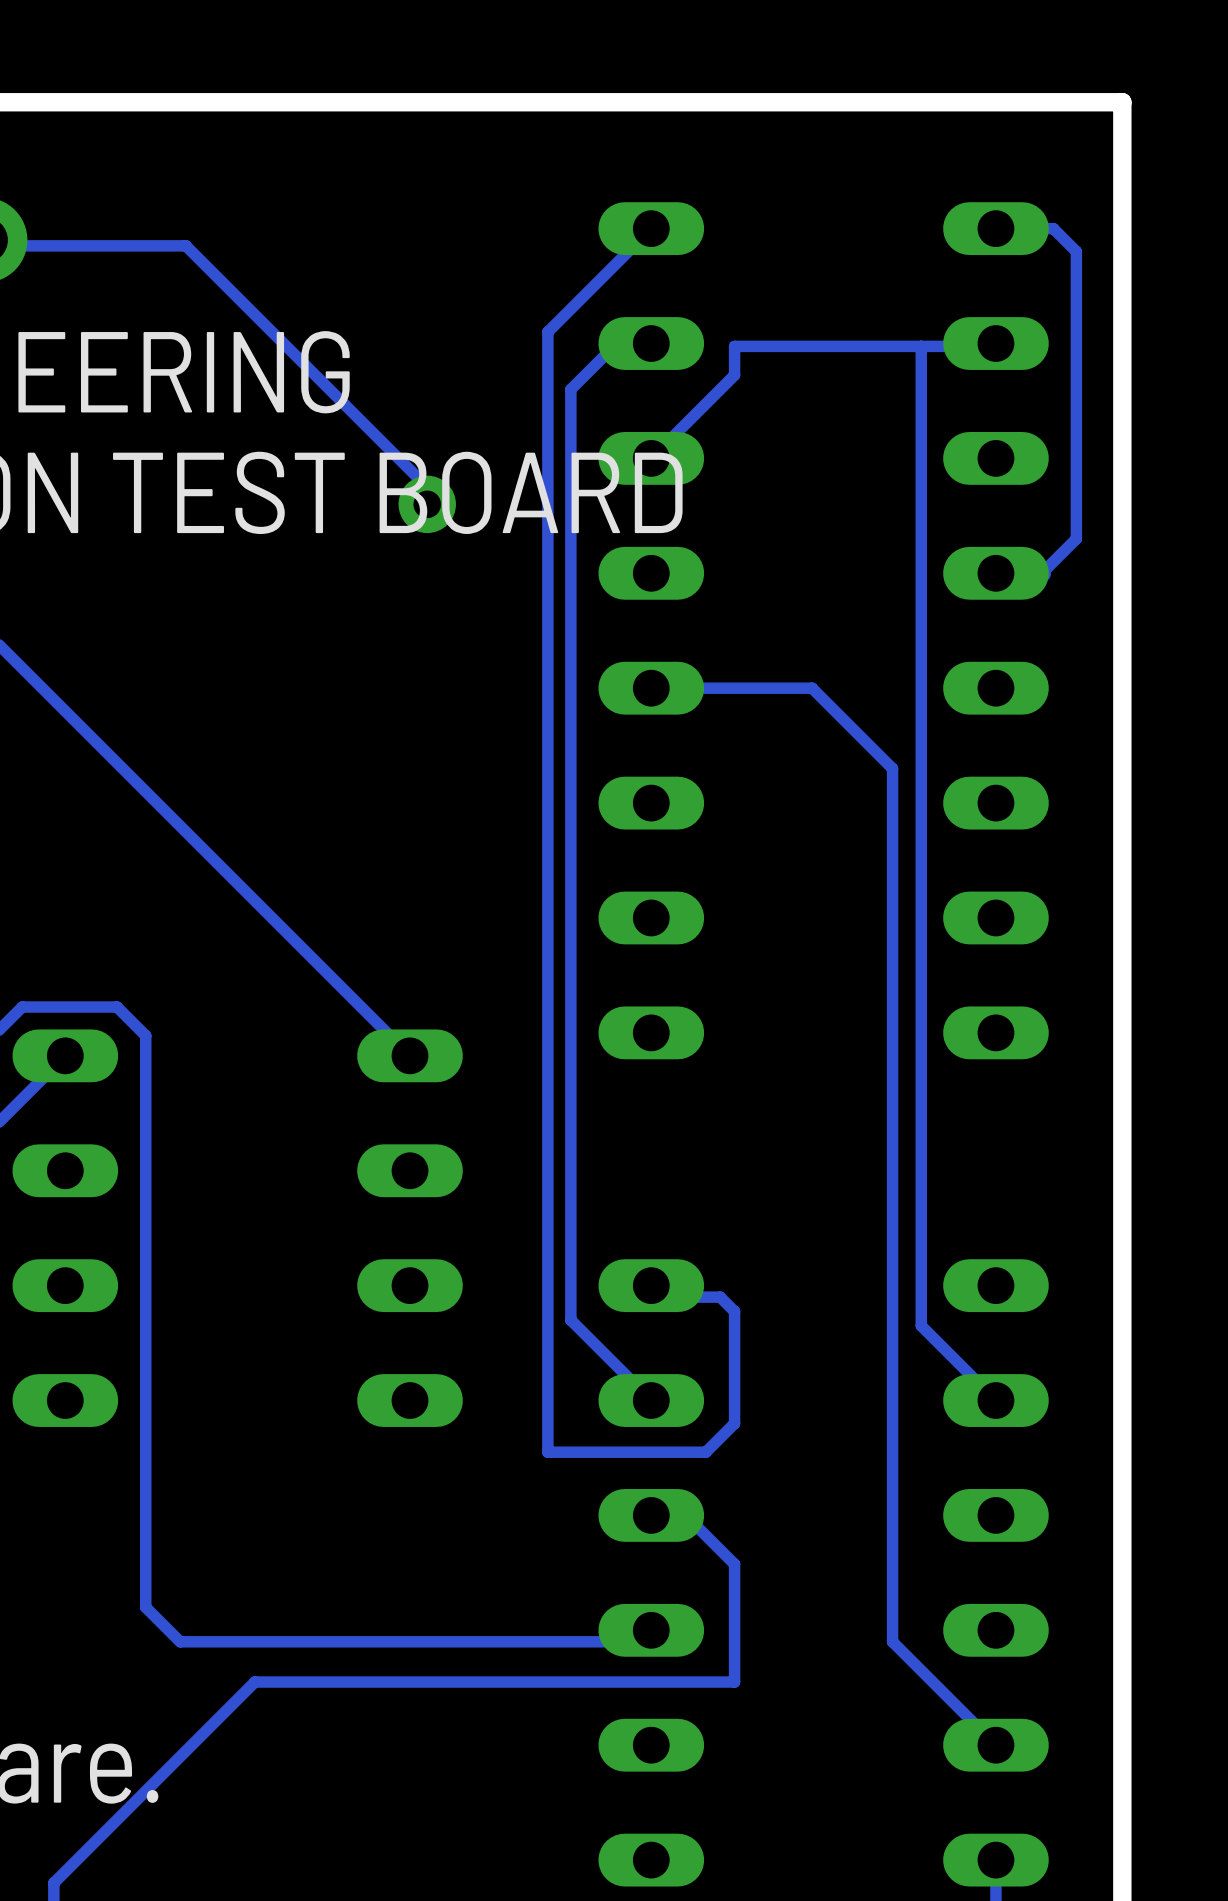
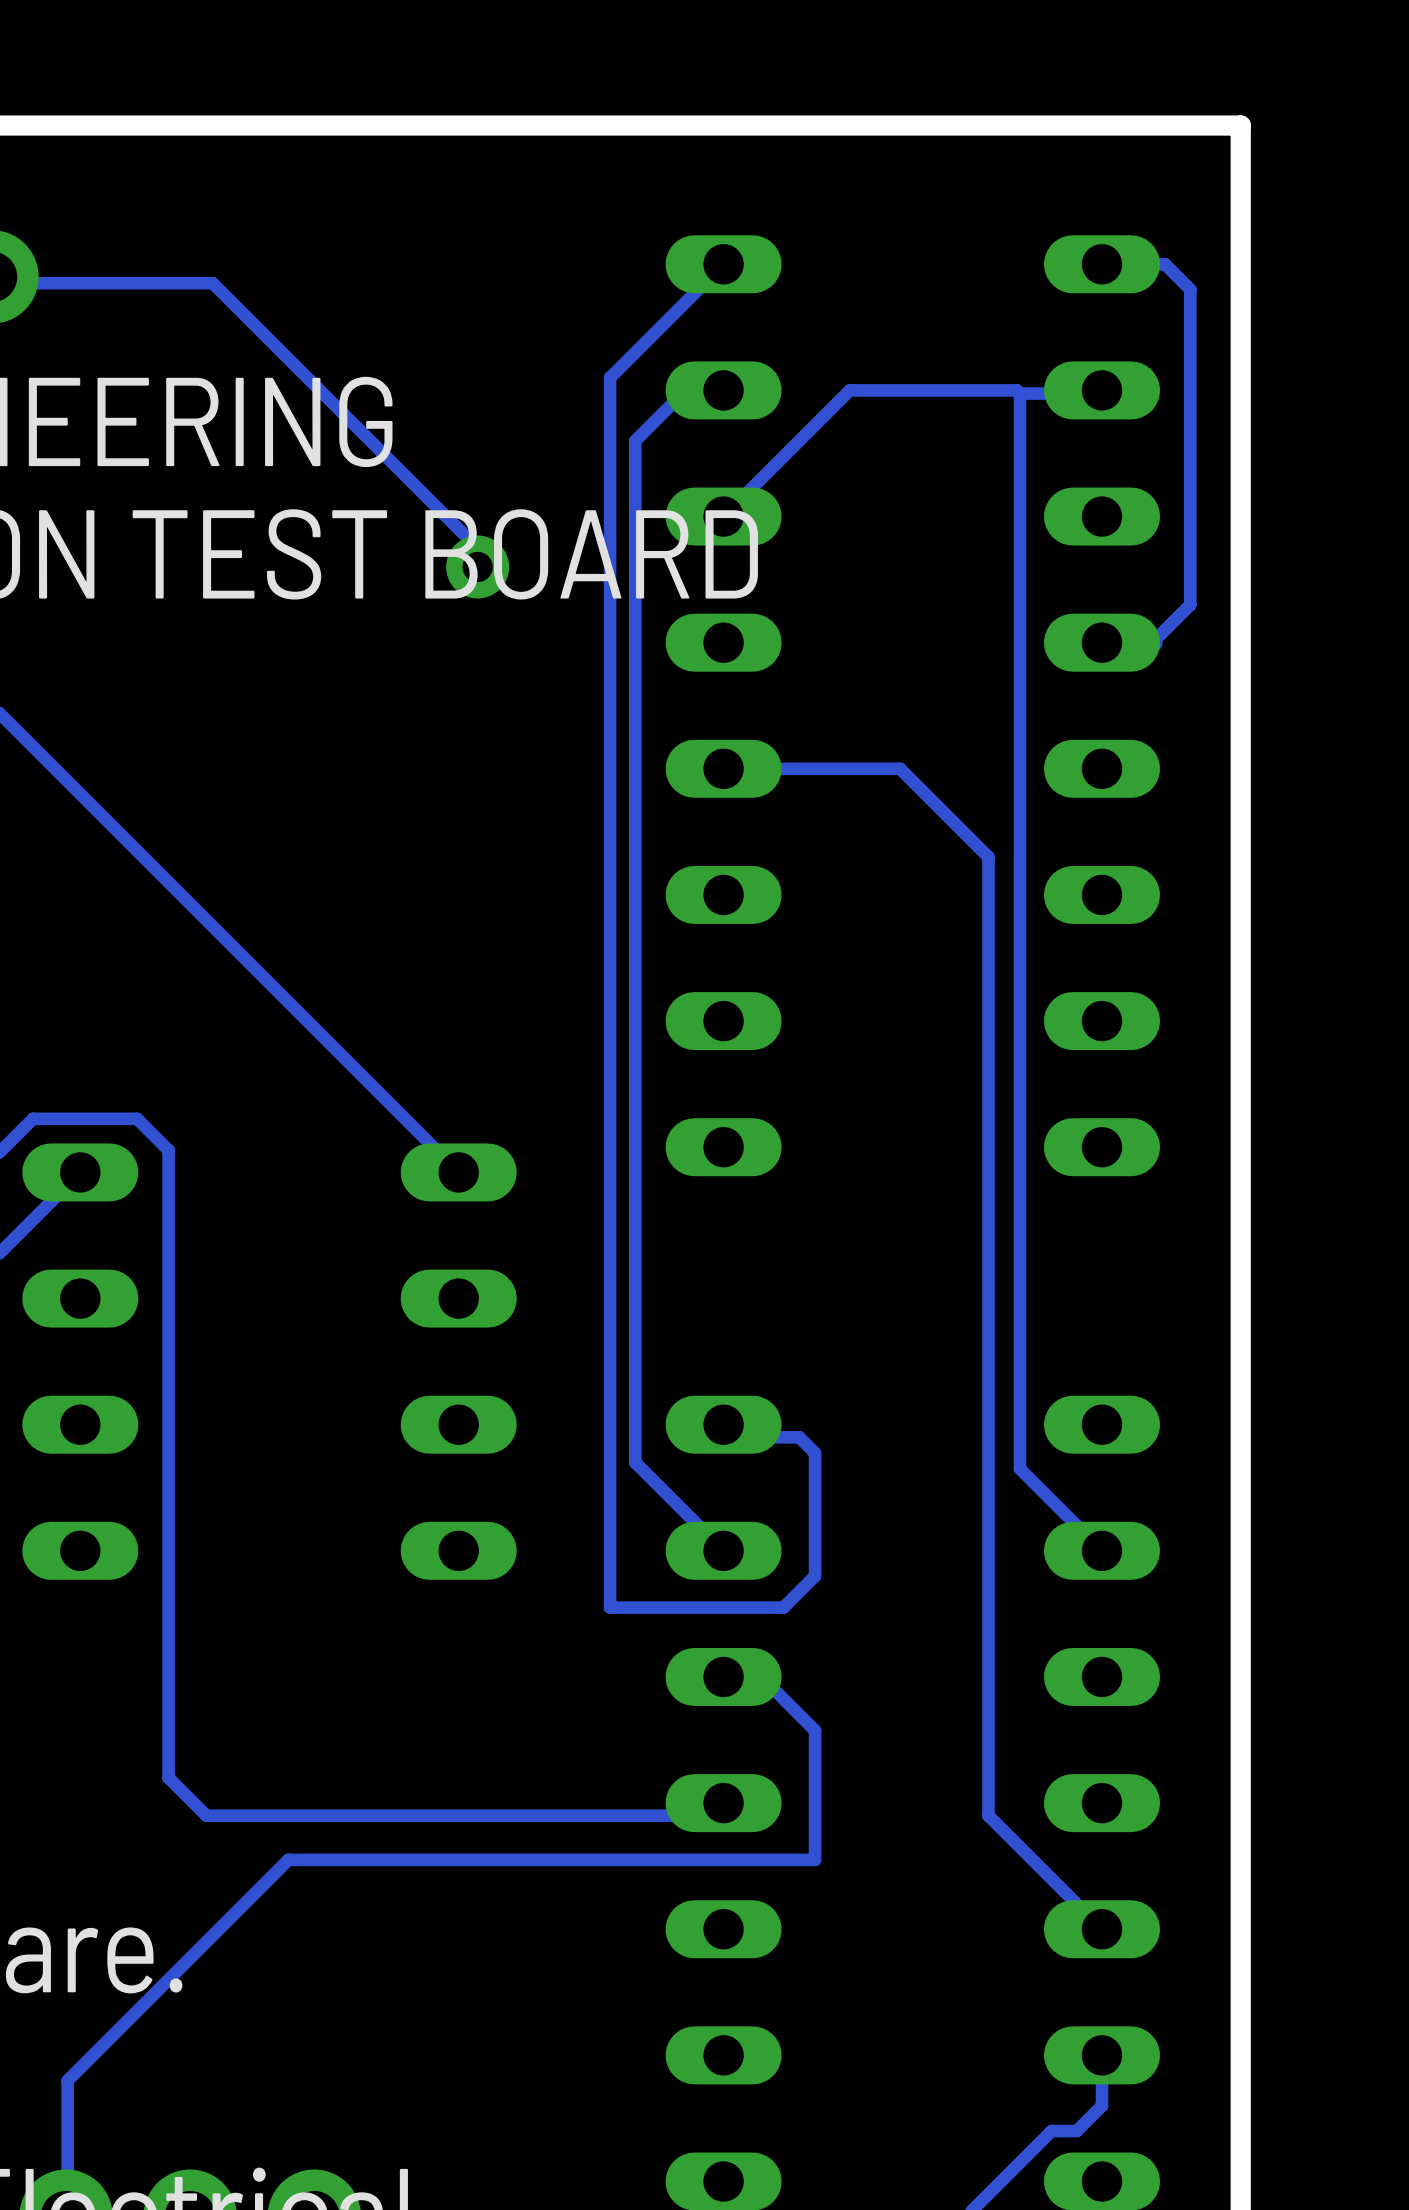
track: (921, 346) (734, 346) (734, 375) -> (1020, 393) (1016, 390) (849, 390) (815, 425)

